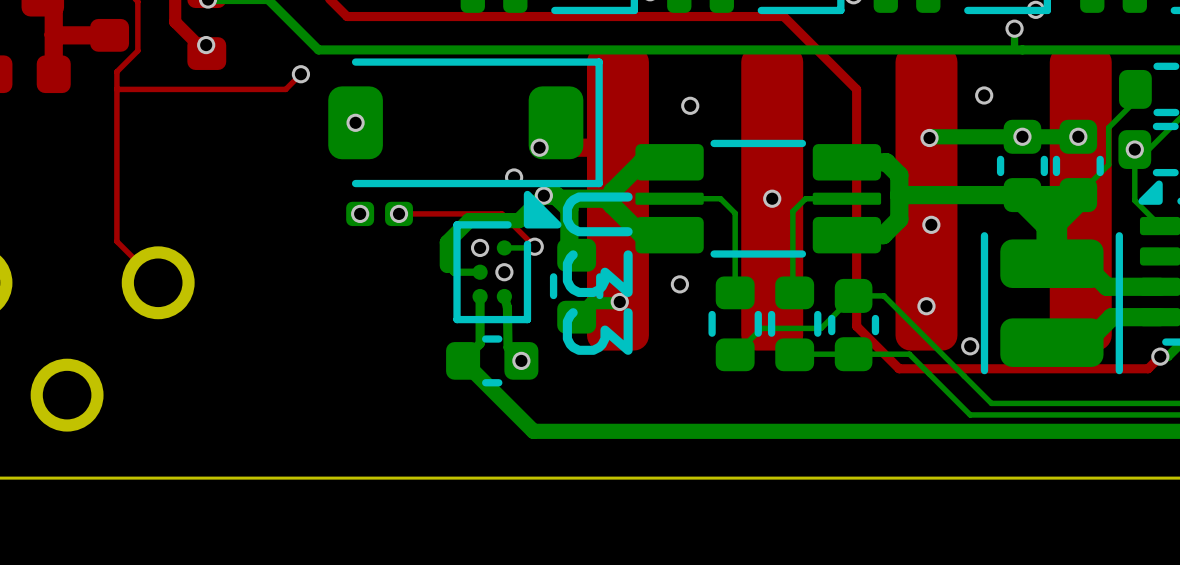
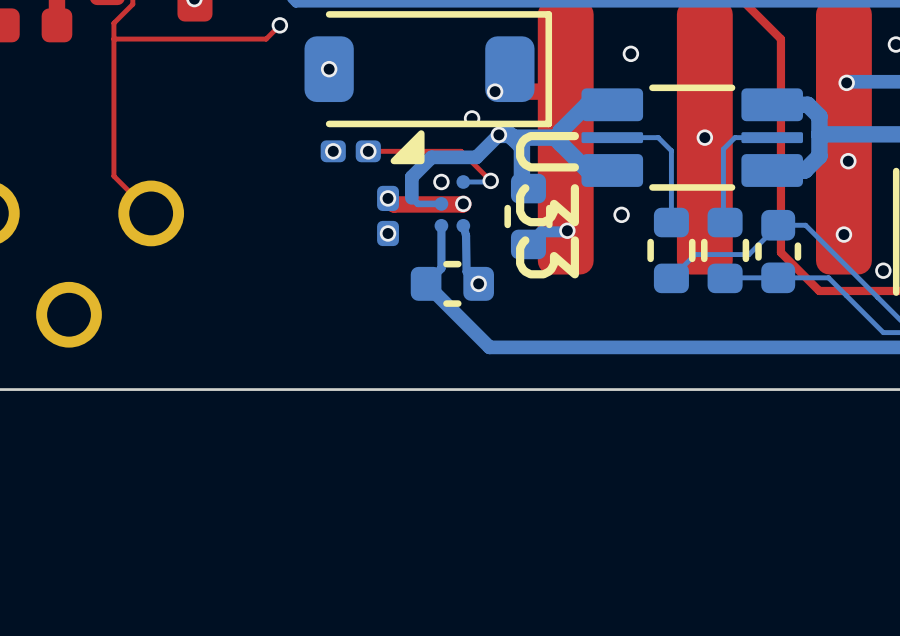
U33 footprint: [453, 190, 562, 324] -> [390, 130, 471, 233]
top track: none -> (388, 198) (394, 204) (462, 204)
via: none -> (388, 198)
part: none -> (388, 215)
via: none -> (388, 233)

